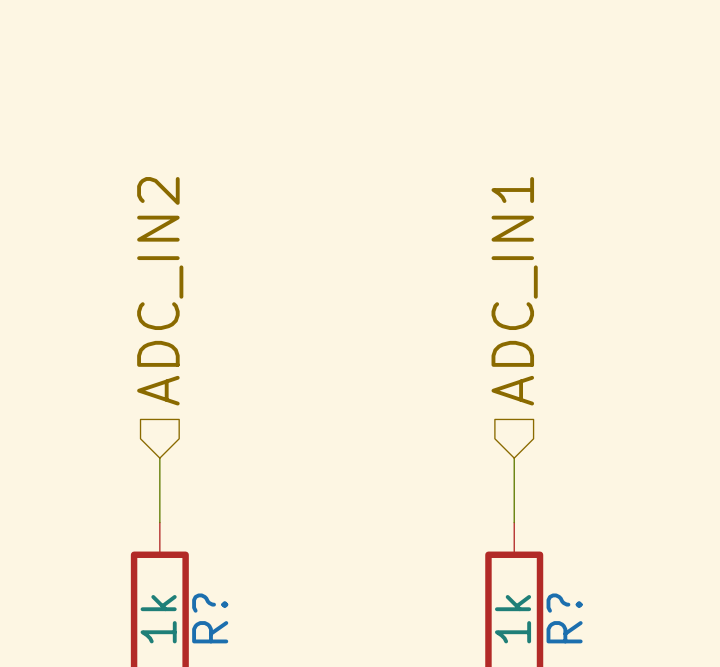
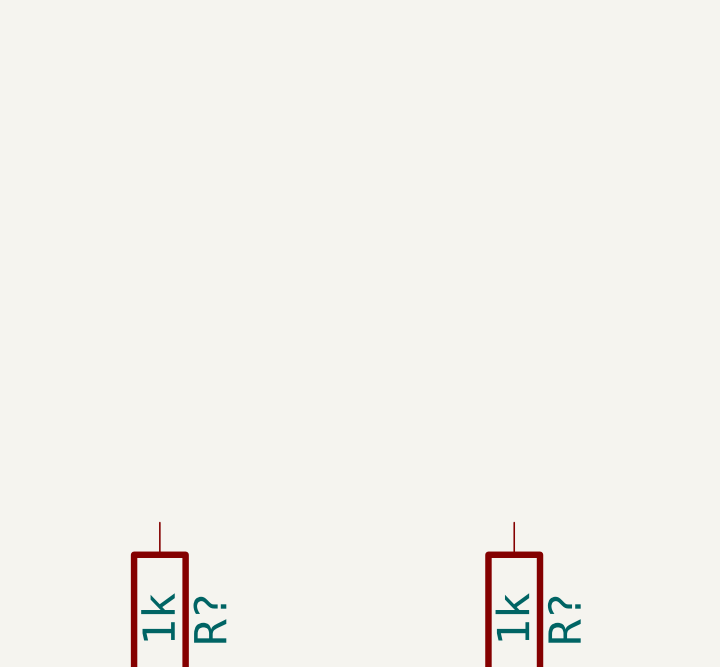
hierarchical label: ADC_IN2 (160, 291) -> none
hierarchical label: ADC_IN1 (514, 291) -> none
wire: (159, 458) (159, 522) -> none
wire: (514, 458) (514, 522) -> none

